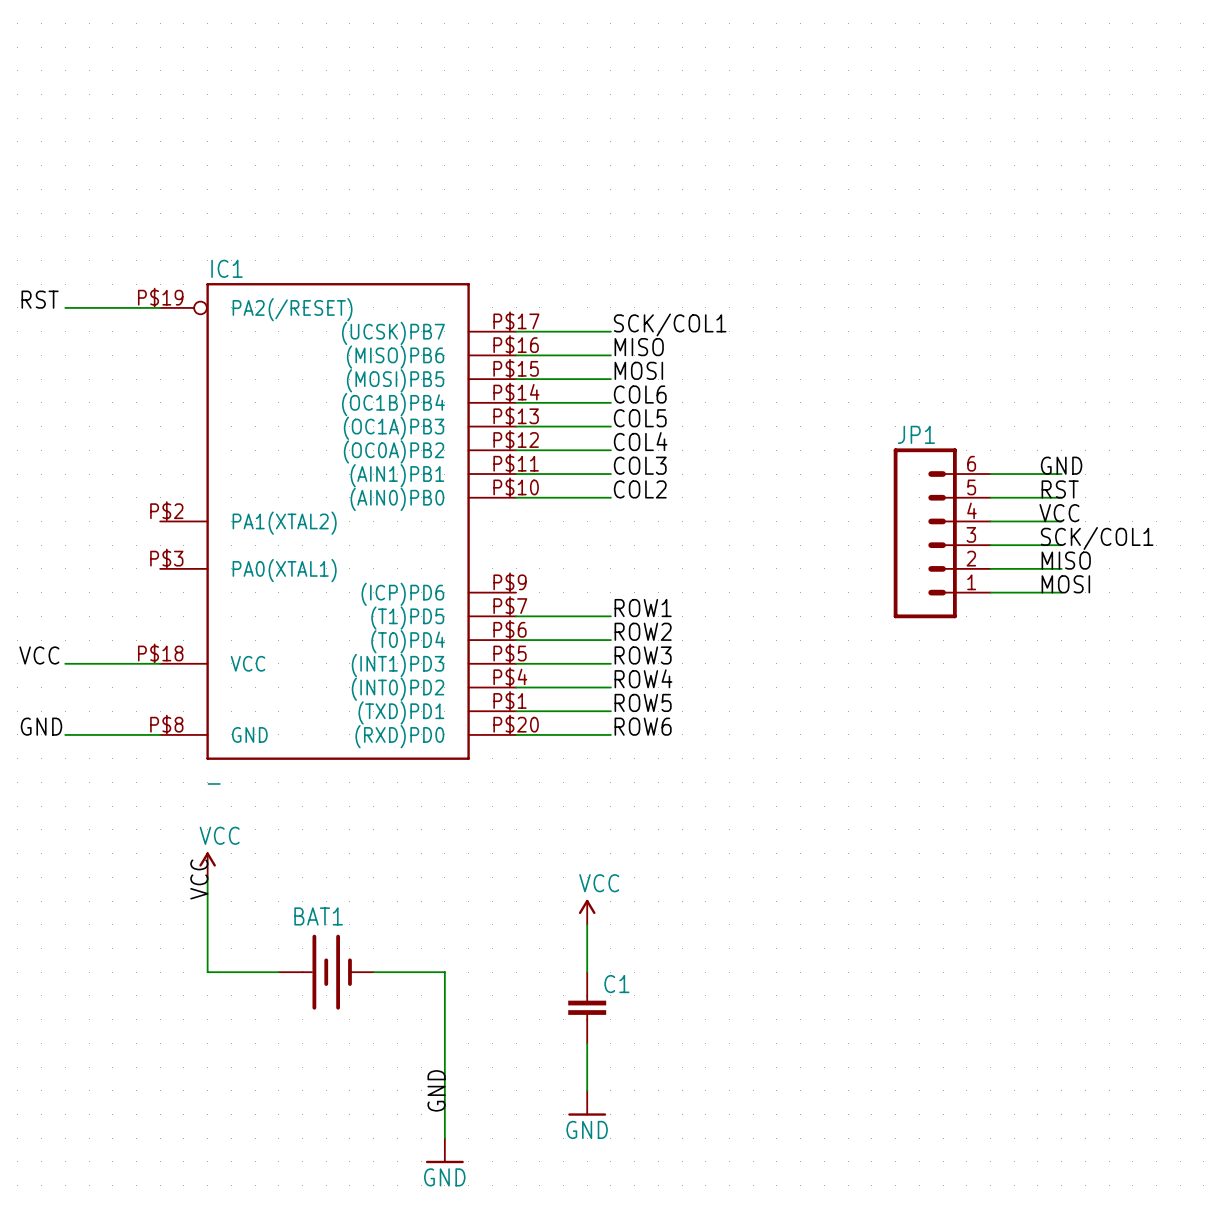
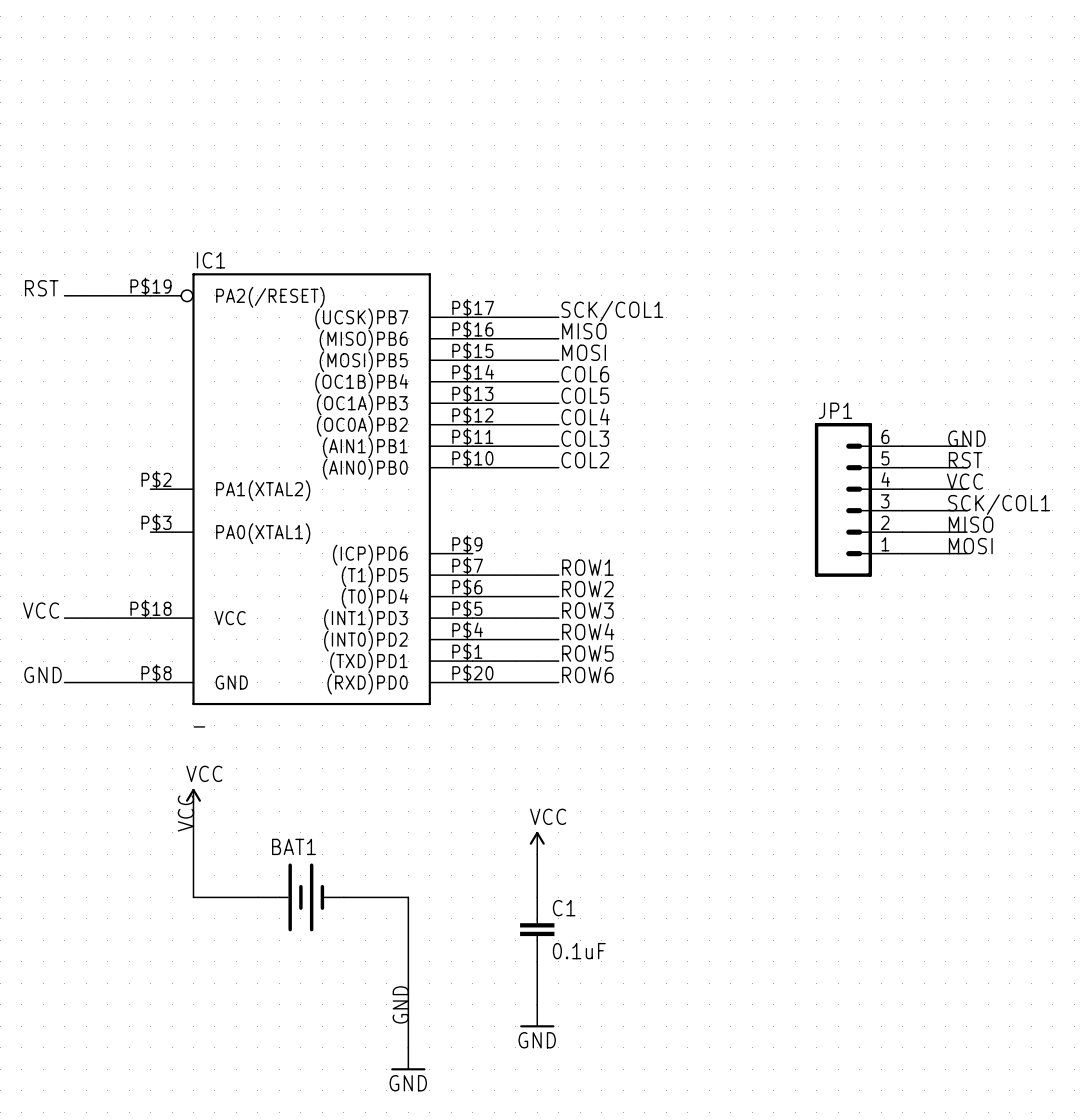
C1 value: none -> 0.1uF (579, 951)

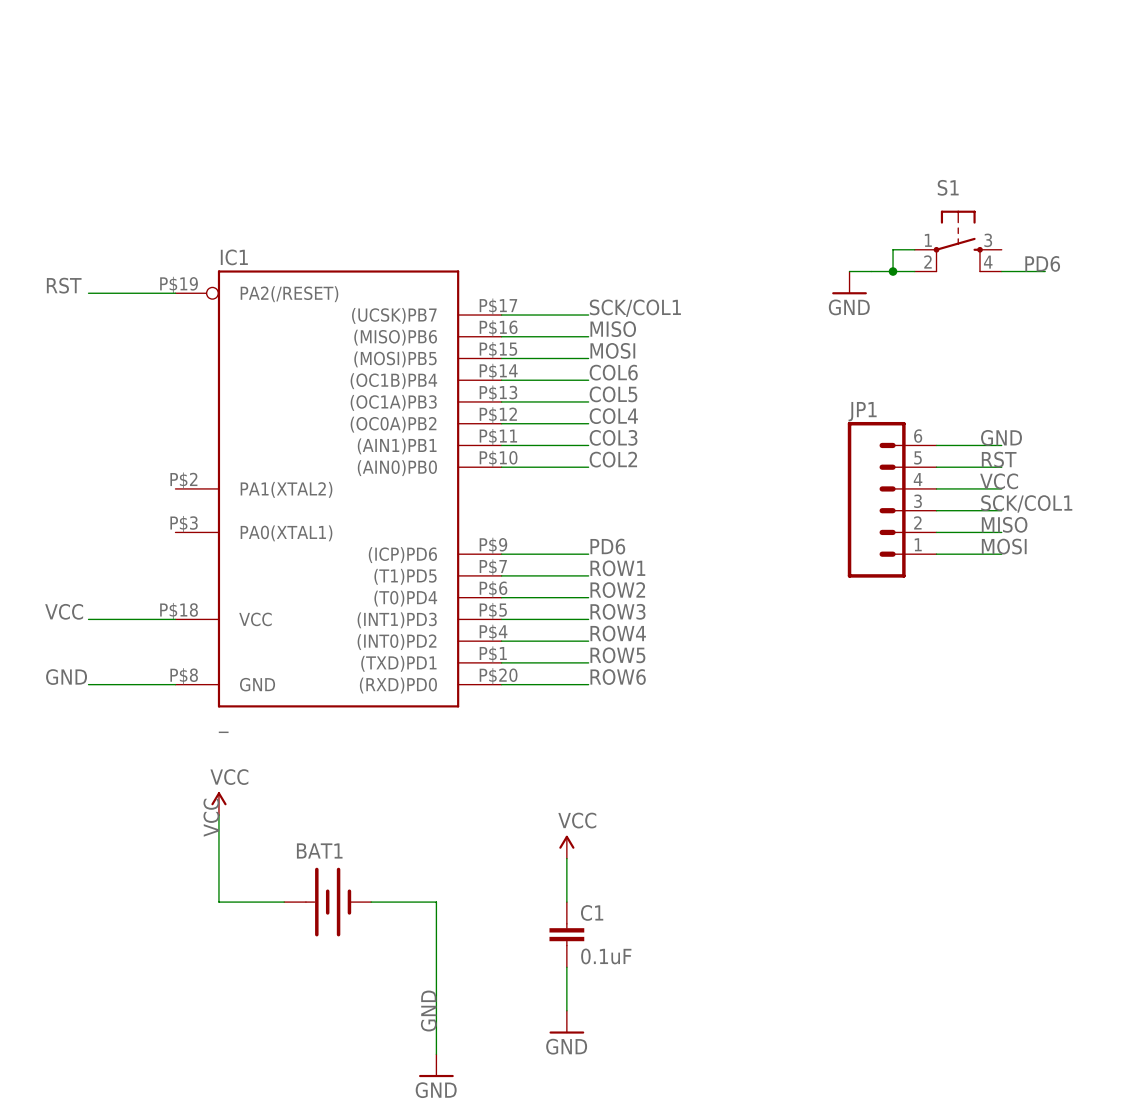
S1: none -> (958, 241)
wire: none -> (914, 249) (893, 249) (893, 271)
label: none -> PD6 (1042, 263)
wire: none -> (849, 271) (914, 271)
junction: none -> (893, 271)
wire: none -> (1001, 271) (1045, 271)
power symbol: none -> GND (849, 282)
label: none -> PD6 (607, 546)
wire: none -> (501, 554) (588, 554)

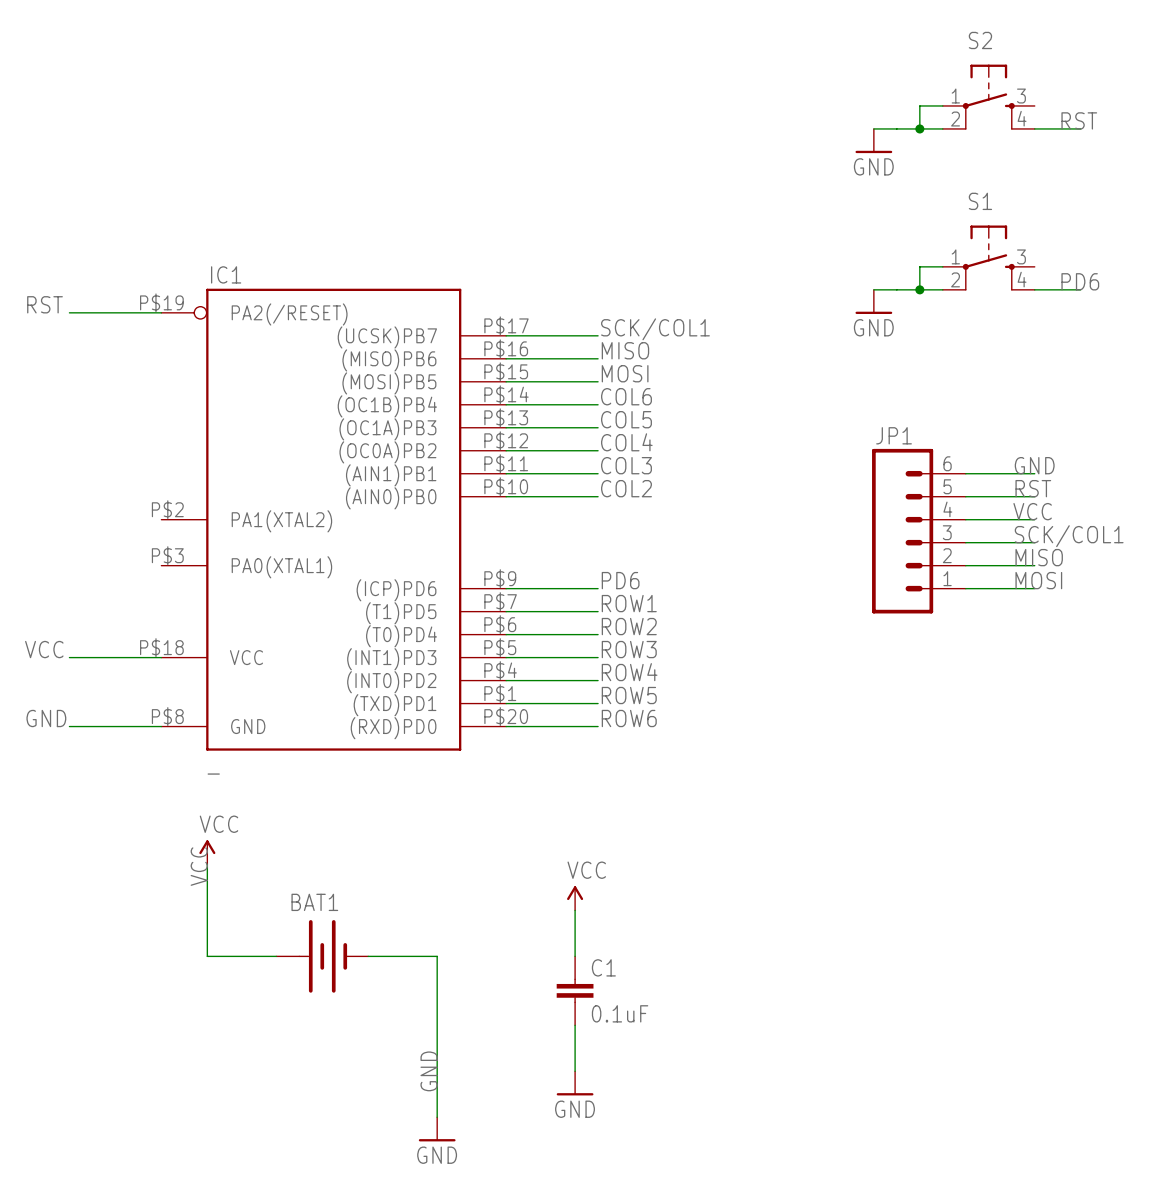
S2: none -> (988, 97)
wire: none -> (942, 105) (919, 105) (919, 128)
label: none -> RST (1079, 120)
wire: none -> (873, 128) (942, 128)
junction: none -> (919, 128)
wire: none -> (1034, 128) (1080, 128)
power symbol: none -> GND (873, 141)

